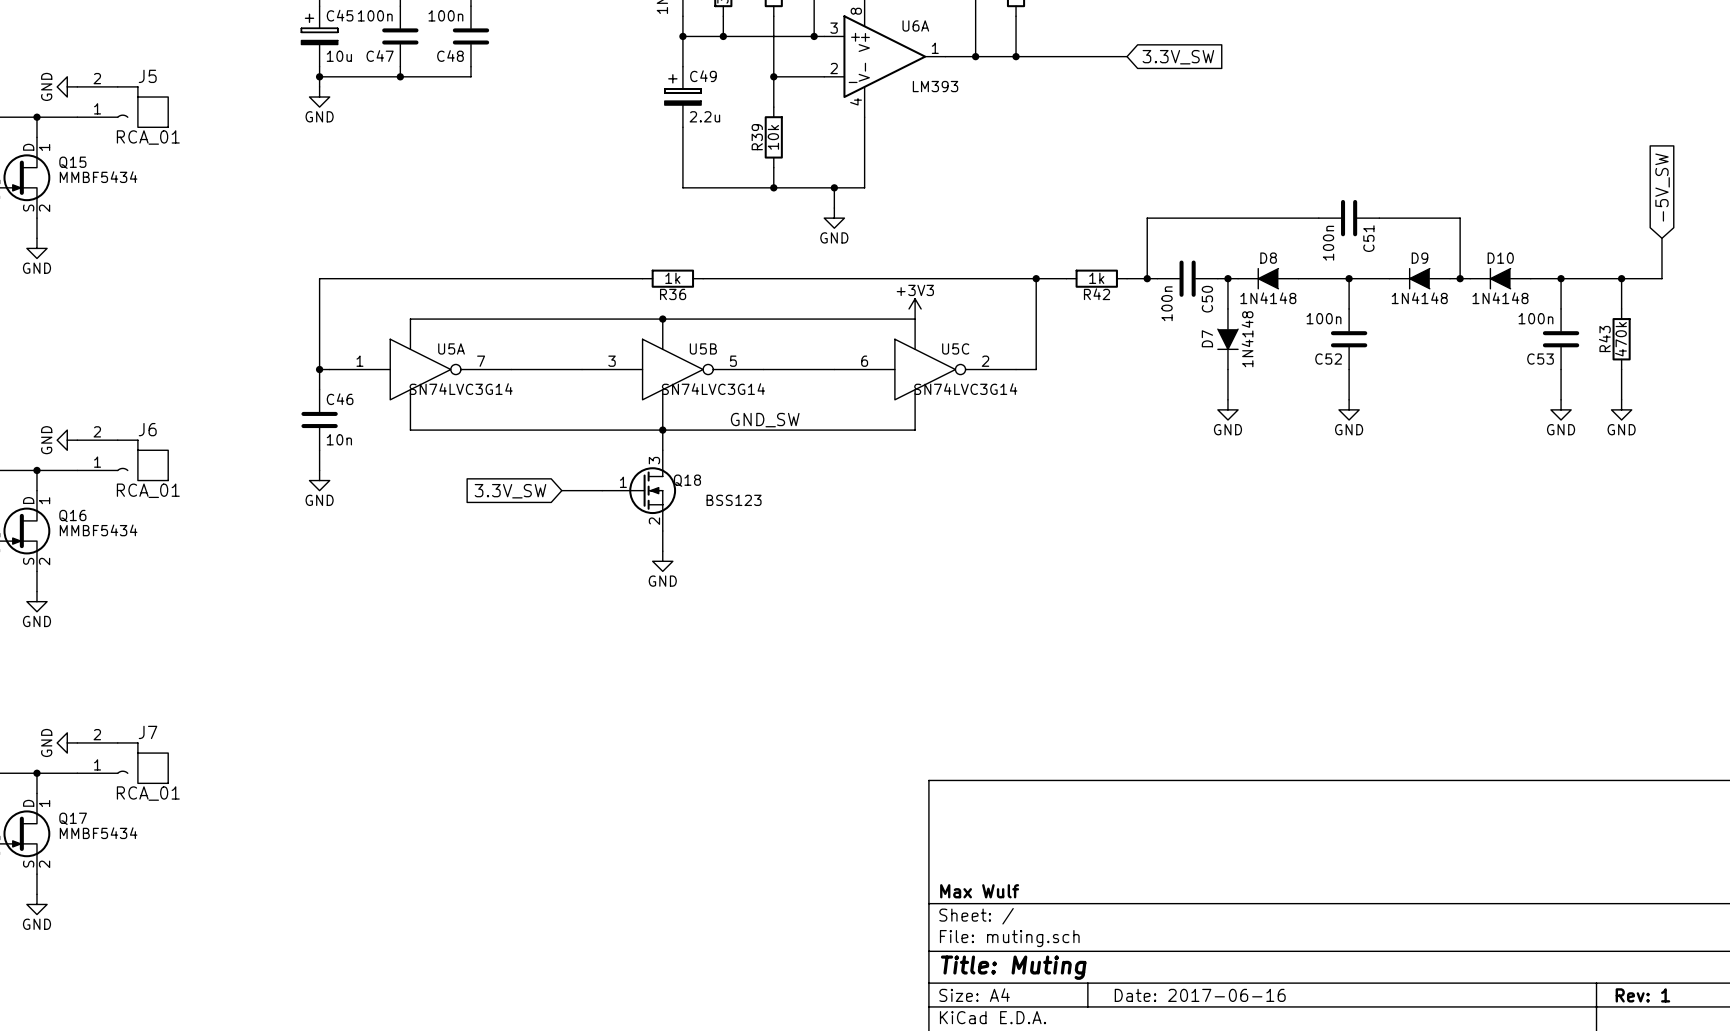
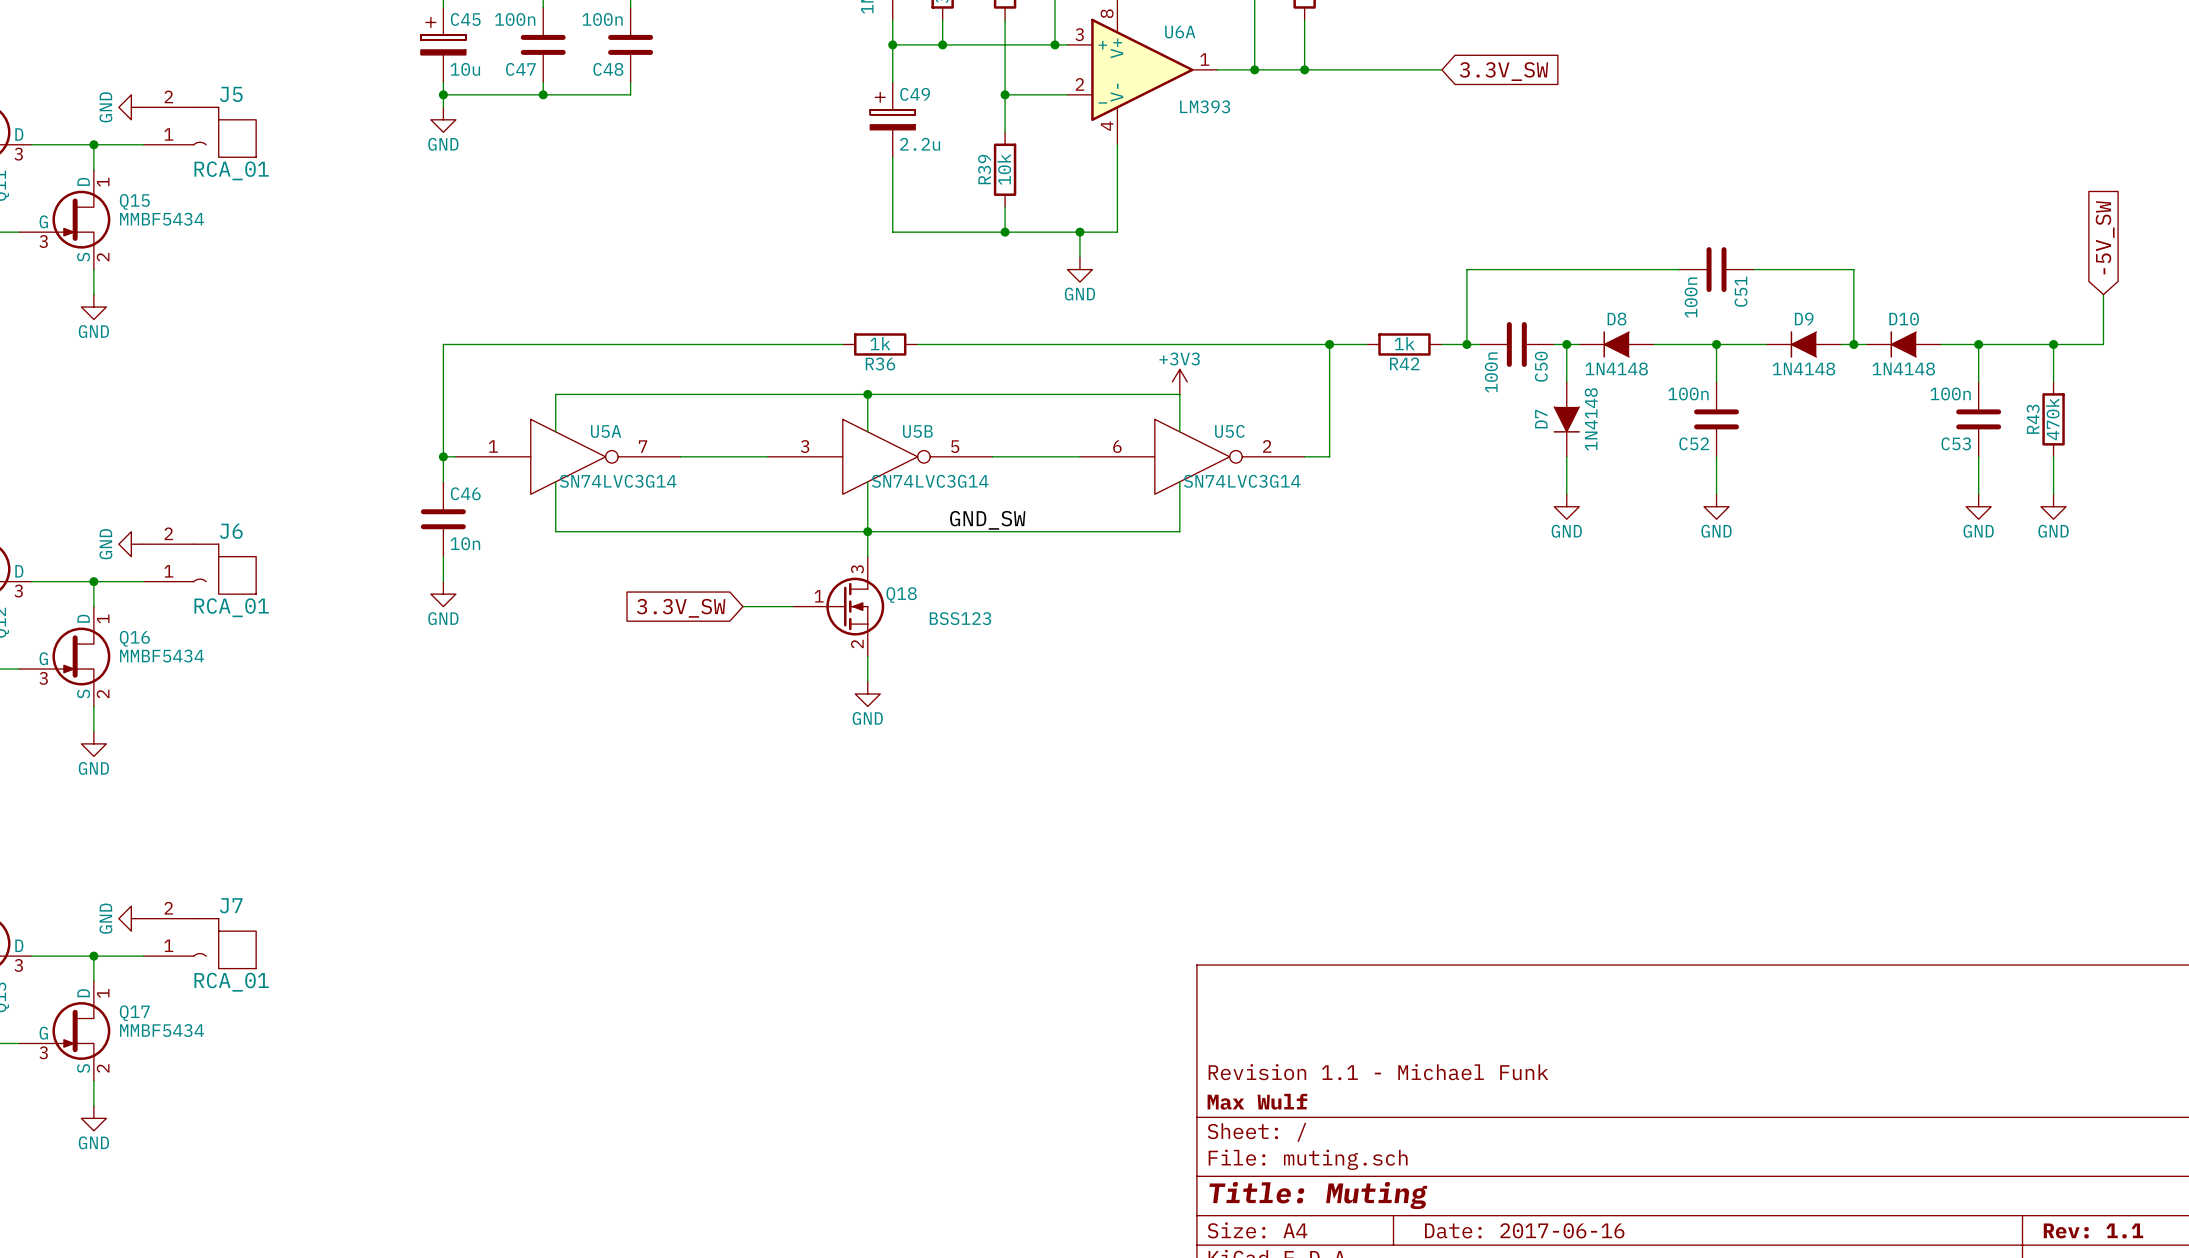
title block: none -> Revision 1.1 - Michael Funk (1378, 1072)
title block: Rev: 1 (1642, 995) -> Rev: 1.1 (2093, 1230)

